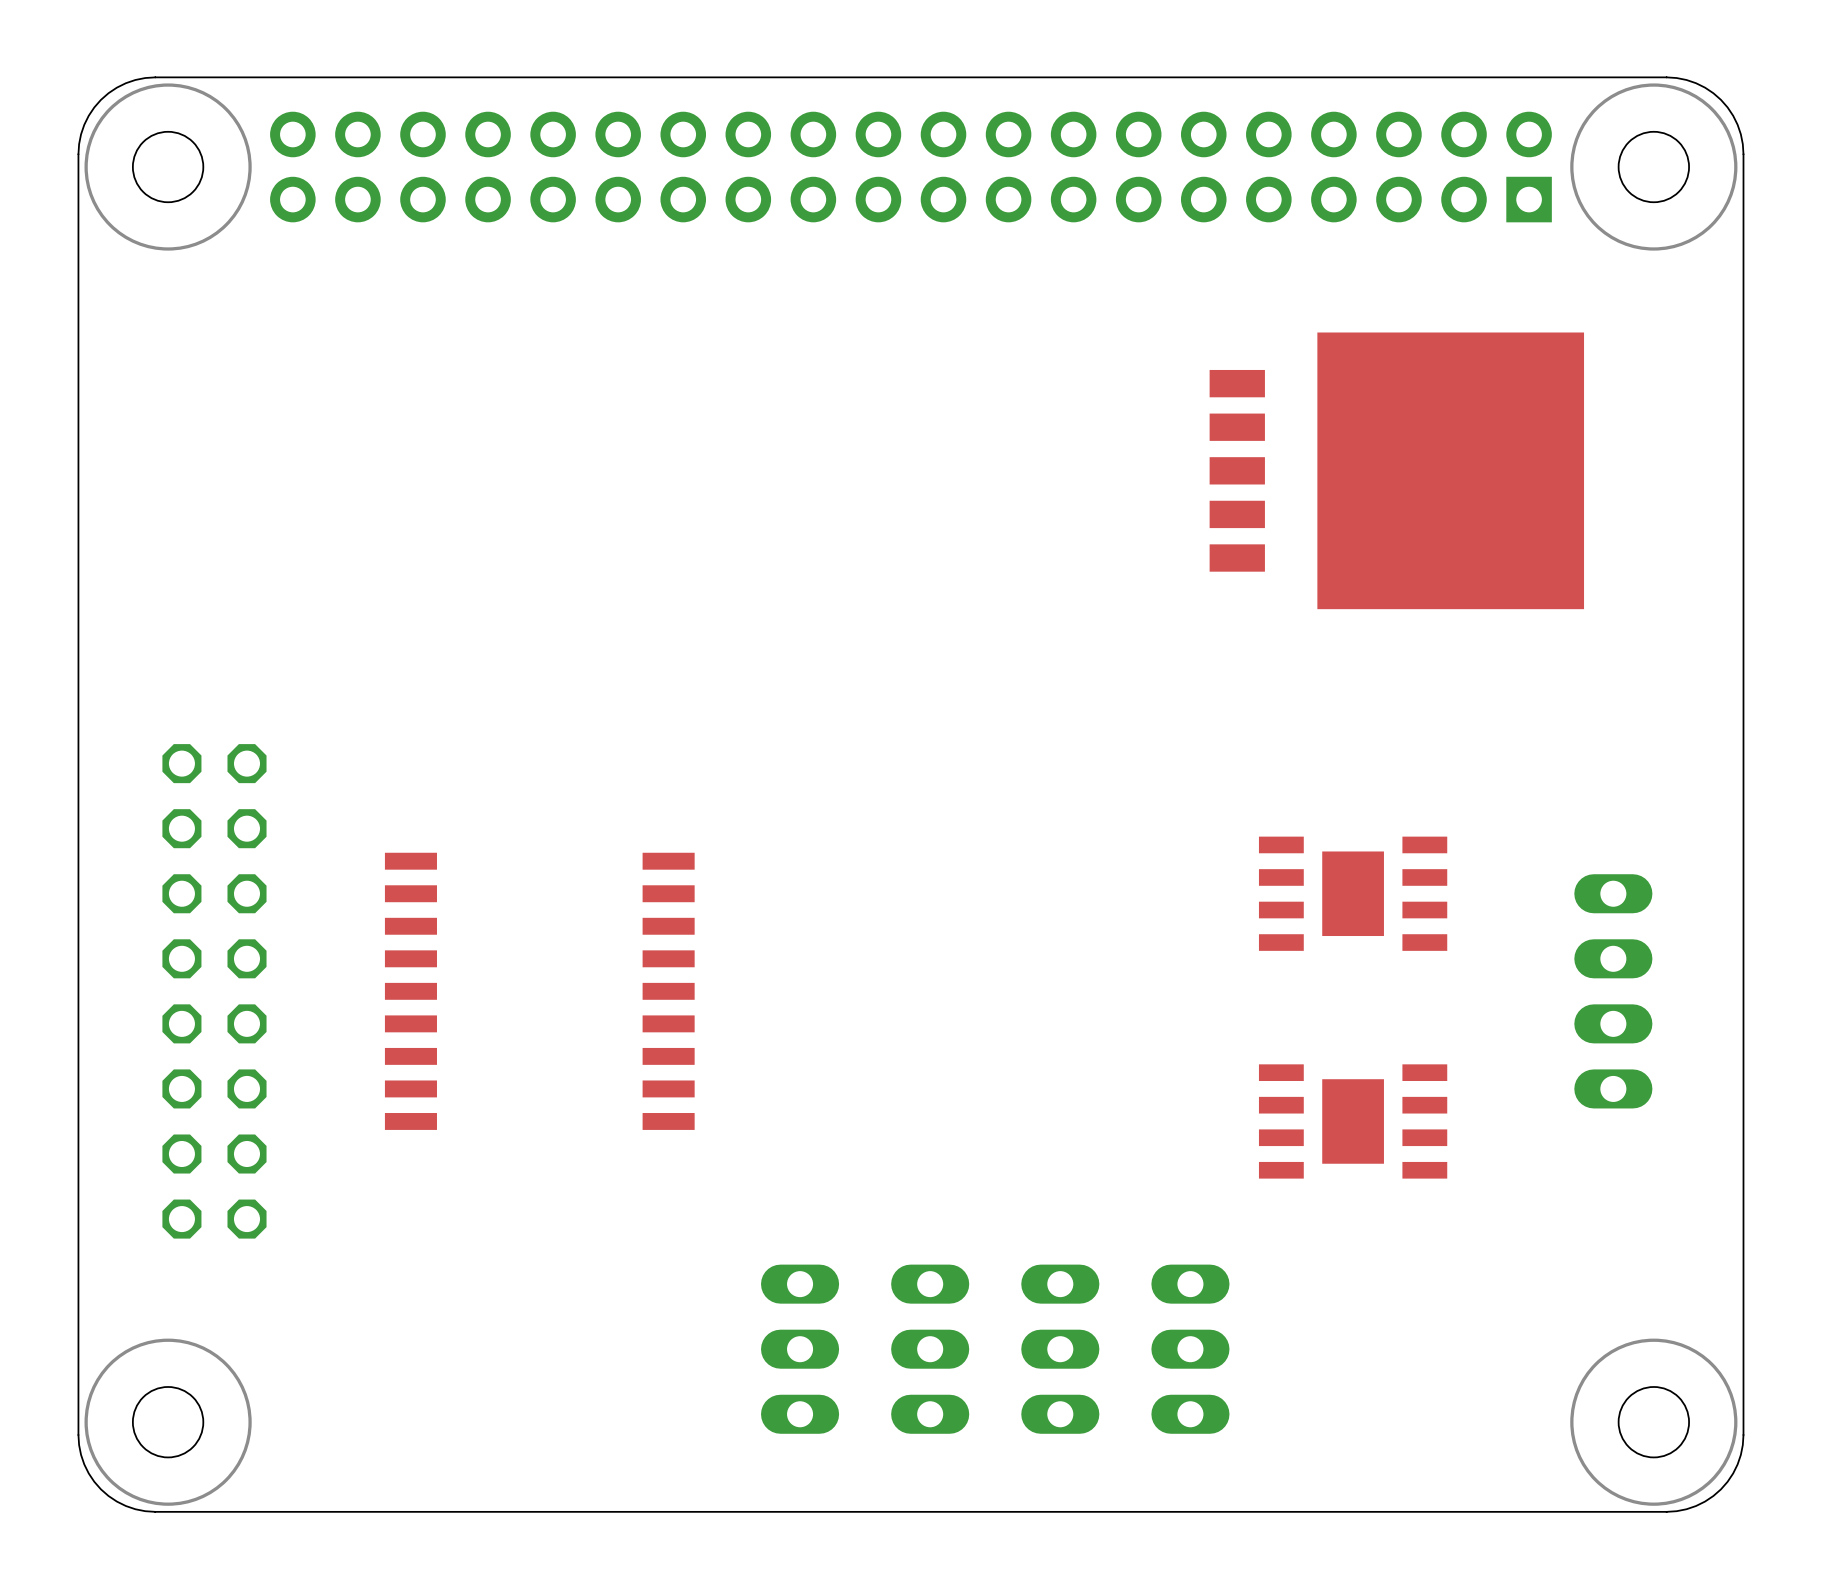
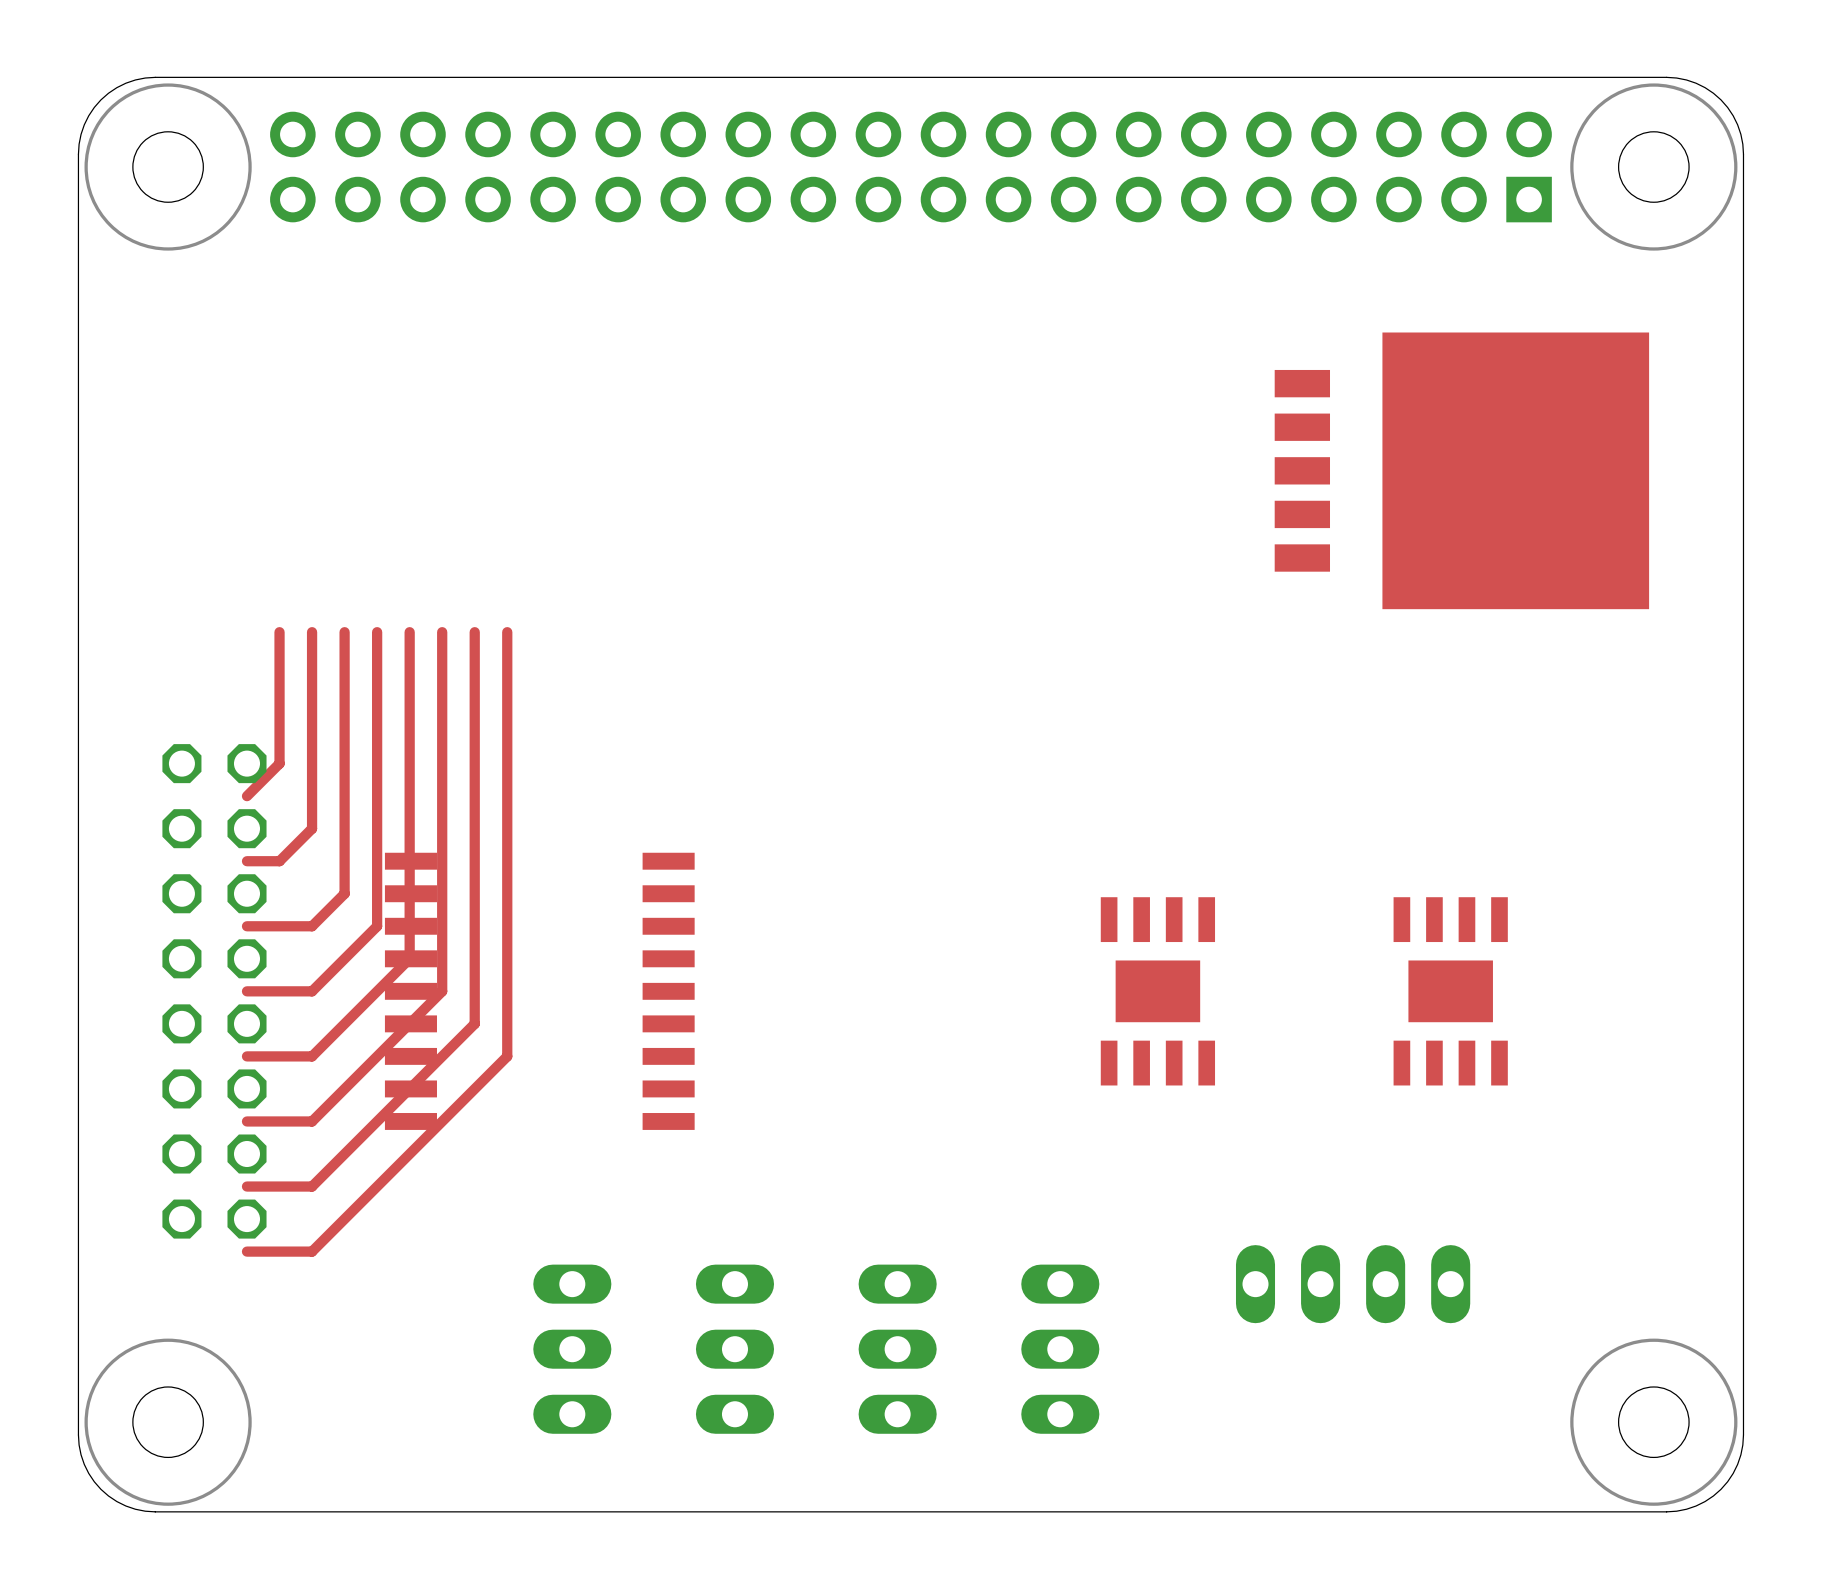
part position: (1396, 470) -> (1461, 470)
top track: none -> (279, 632) (279, 763) (247, 796)
top track: none -> (312, 632) (312, 828) (279, 861) (247, 861)
top track: none -> (344, 632) (344, 893) (312, 926) (247, 926)
top track: none -> (377, 632) (377, 926) (312, 991) (247, 991)
top track: none -> (409, 632) (409, 958) (312, 1056) (247, 1056)
top track: none -> (442, 632) (442, 991) (312, 1121) (247, 1121)
top track: none -> (474, 632) (474, 1023) (312, 1186) (247, 1186)
top track: none -> (507, 632) (507, 1056) (312, 1251) (247, 1251)
part: (1353, 893) -> none
part: none -> (1157, 991)
part: none -> (1450, 991)
part rotation: 0° (1613, 991) -> 90° clockwise (1353, 1284)
part position: (1613, 991) -> (1353, 1284)
part: (1353, 1121) -> none
part: none -> (572, 1349)
part: none -> (734, 1349)
part: (800, 1349) -> none
part position: (930, 1349) -> (897, 1349)
part: (1190, 1349) -> none

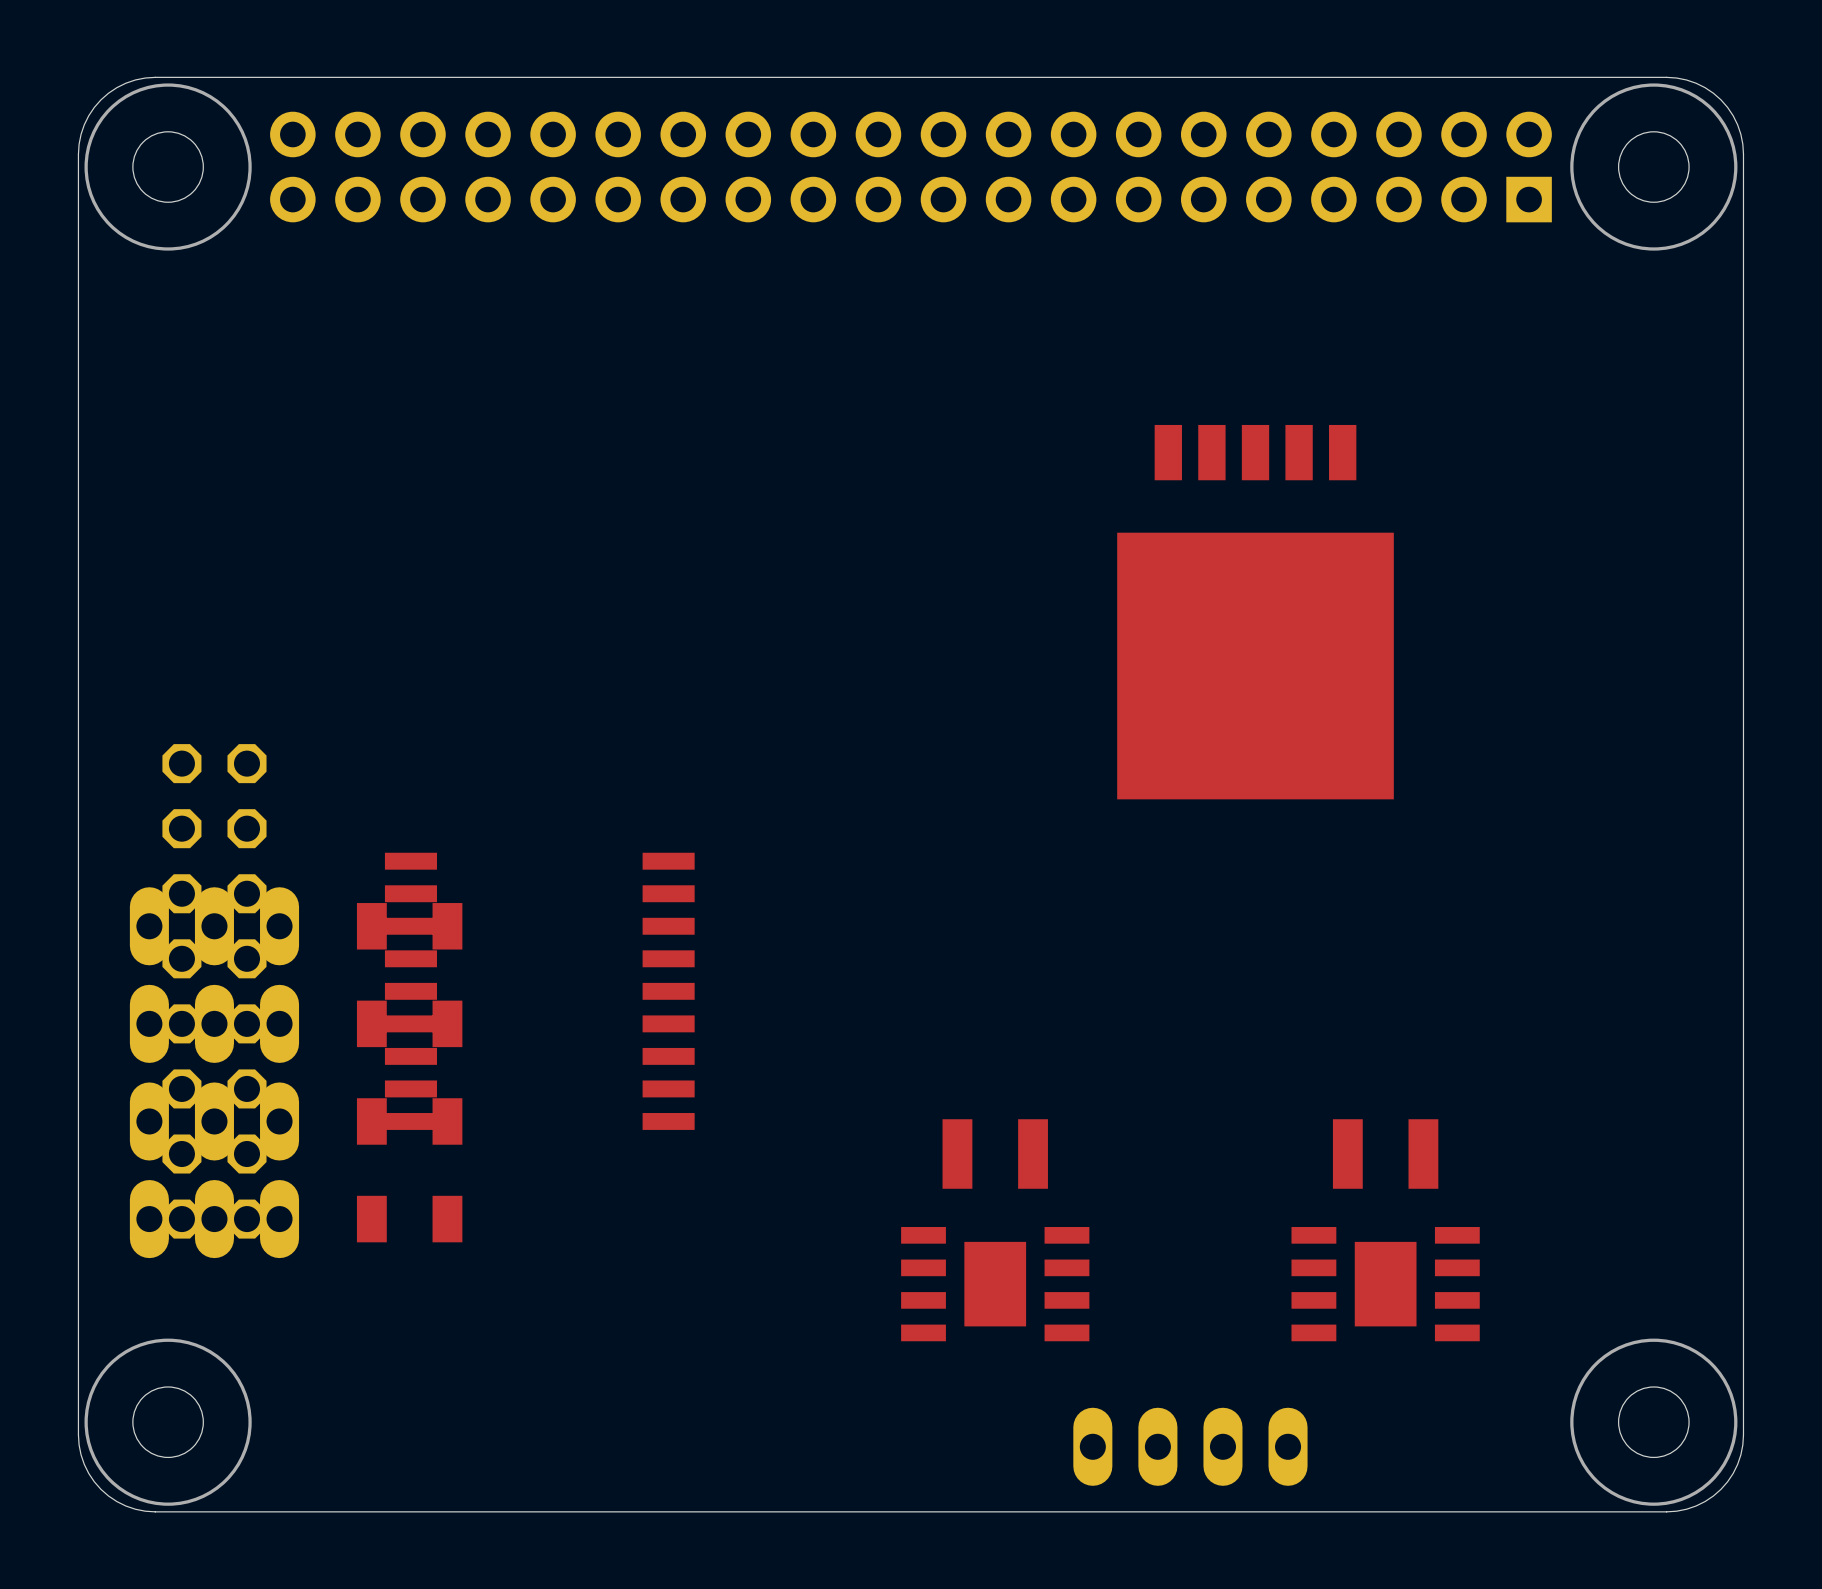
part rotation: 0° (1461, 470) -> 90° clockwise (1255, 612)
part position: (1461, 470) -> (1255, 612)
top track: (279, 632) (279, 763) (247, 796) -> none
top track: (312, 632) (312, 828) (279, 861) (247, 861) -> none
top track: (344, 632) (344, 893) (312, 926) (247, 926) -> none
top track: (377, 632) (377, 926) (312, 991) (247, 991) -> none
top track: (409, 632) (409, 958) (312, 1056) (247, 1056) -> none
top track: (442, 632) (442, 991) (312, 1121) (247, 1121) -> none
top track: (474, 632) (474, 1023) (312, 1186) (247, 1186) -> none
top track: (507, 632) (507, 1056) (312, 1251) (247, 1251) -> none
part: none -> (214, 926)
part: none -> (409, 926)
part: (1157, 991) -> none
part: (1450, 991) -> none
part: none -> (214, 1023)
part: none -> (409, 1023)
part: none -> (214, 1121)
part: none -> (409, 1121)
part: none -> (995, 1154)
part: none -> (1385, 1154)
part: none -> (214, 1219)
part: none -> (409, 1219)
part: none -> (995, 1284)
part position: (1353, 1284) -> (1190, 1446)
part: none -> (1385, 1284)
part: (572, 1349) -> none
part: (734, 1349) -> none
part: (897, 1349) -> none
part: (1060, 1349) -> none

